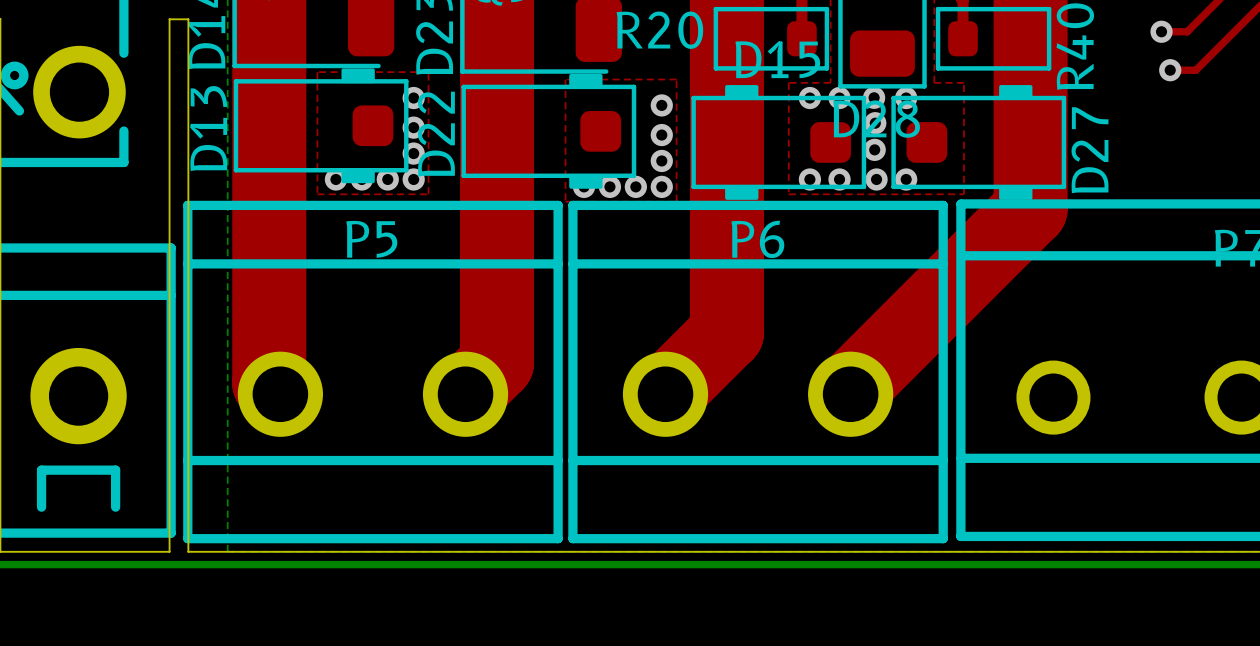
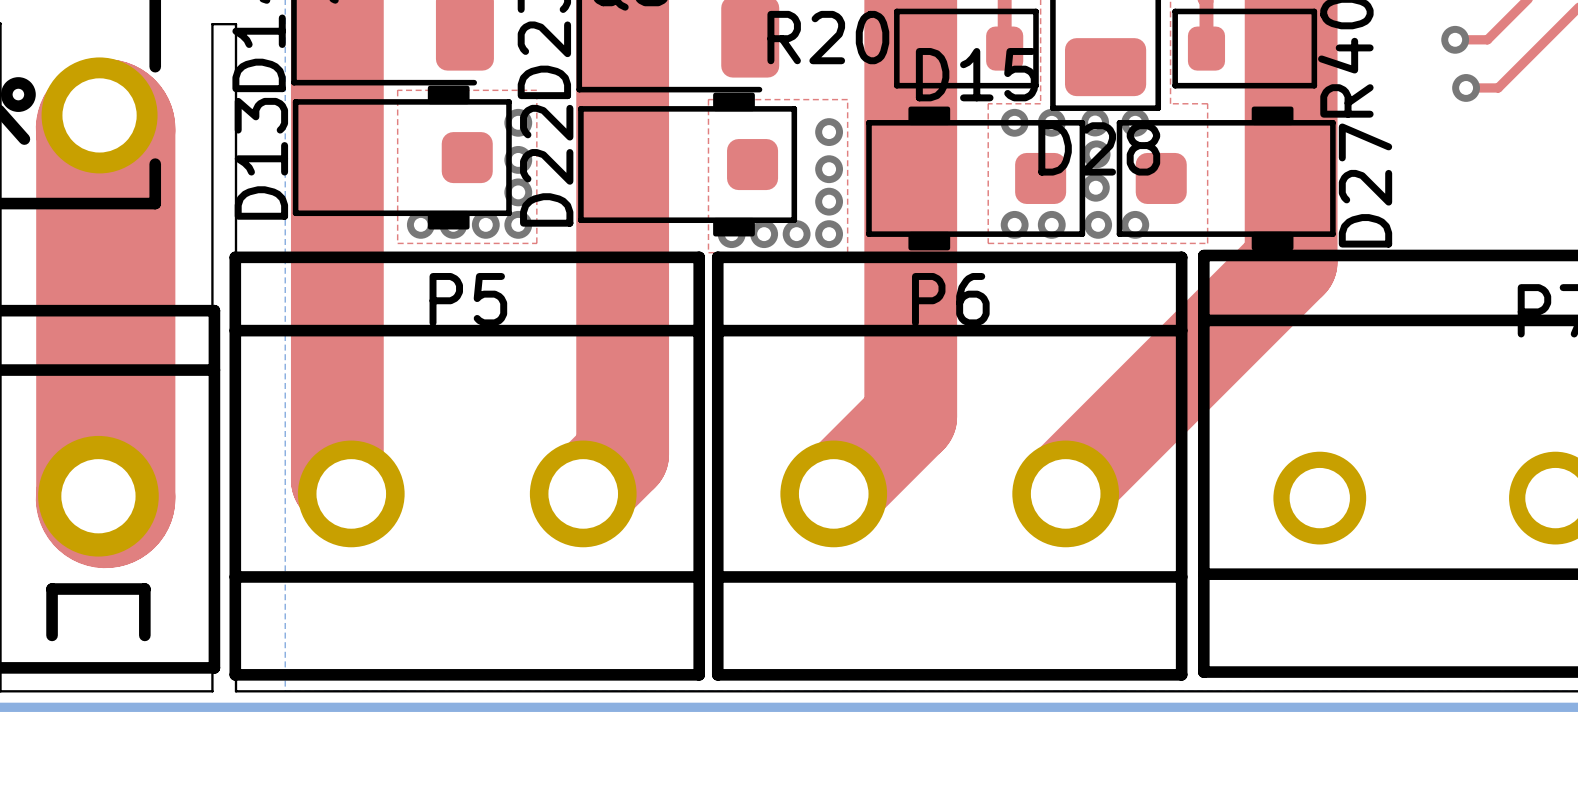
top track: none -> (105, 129) (105, 498)

